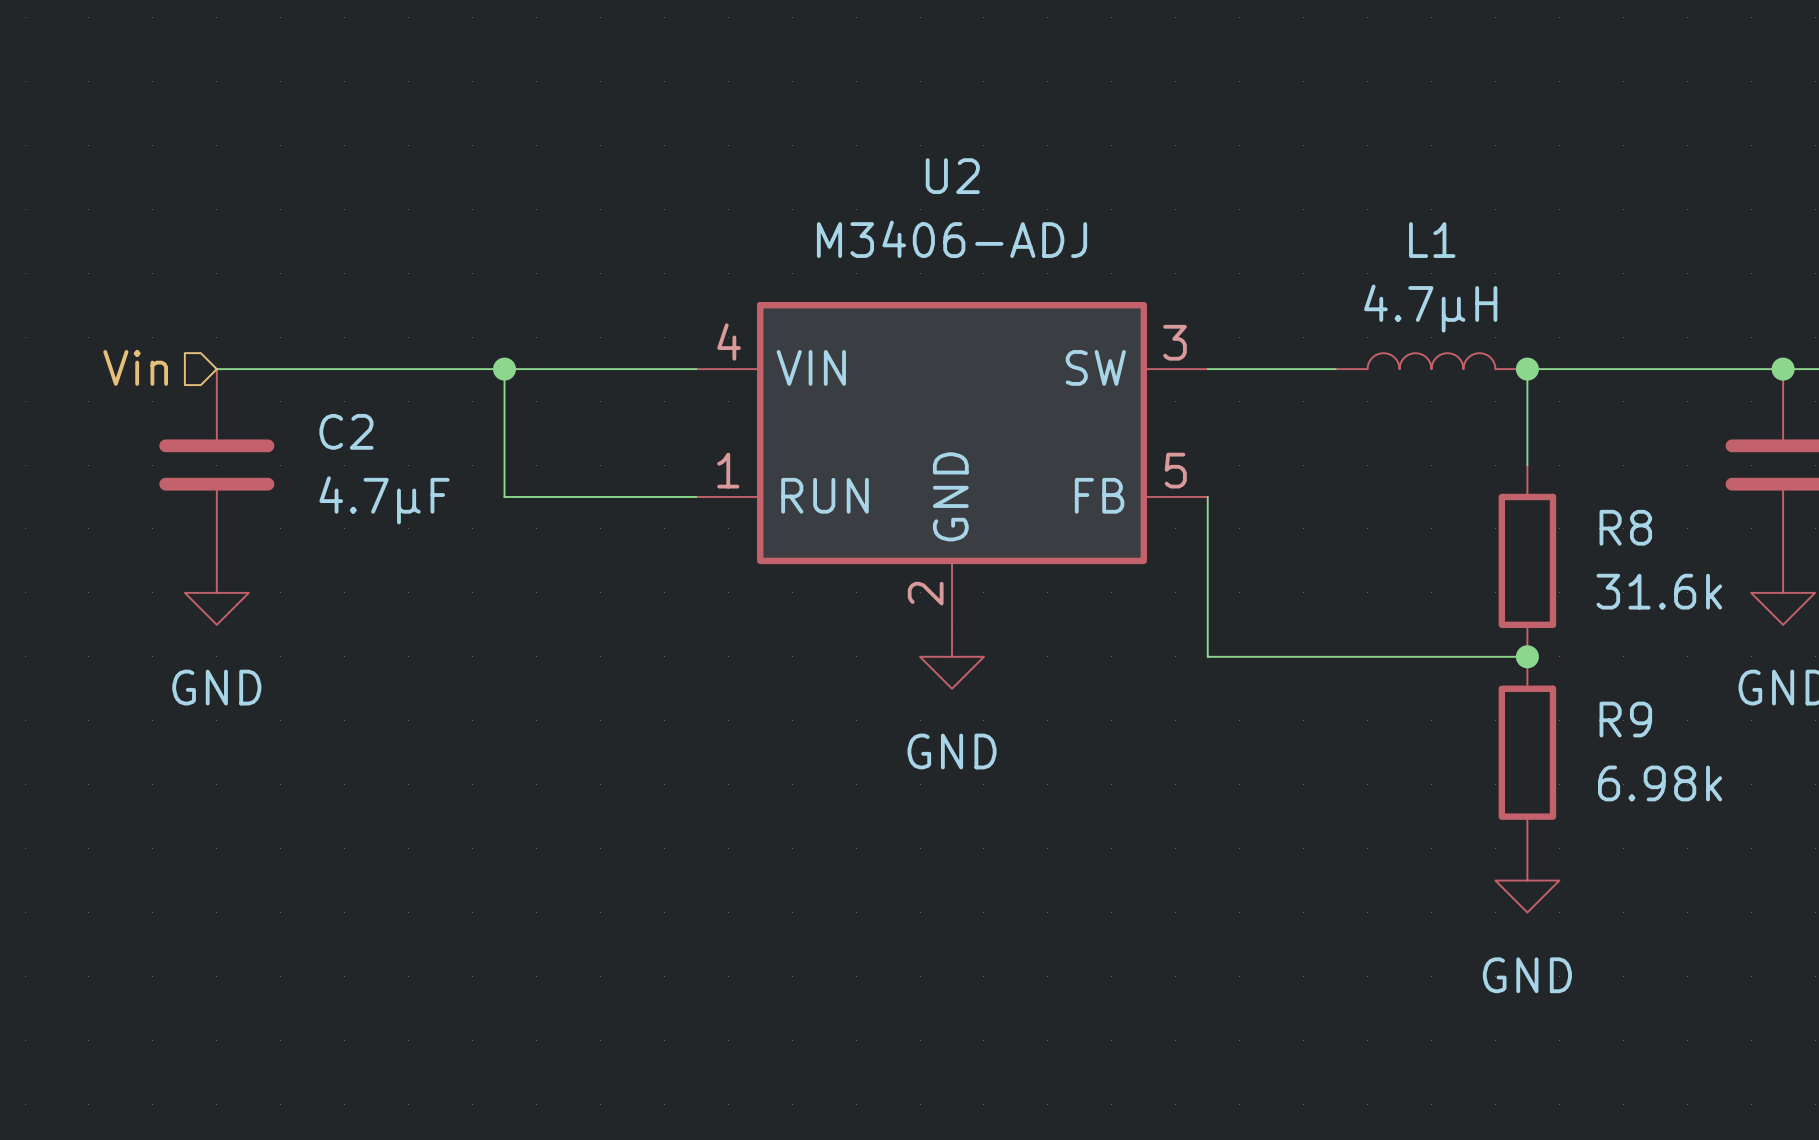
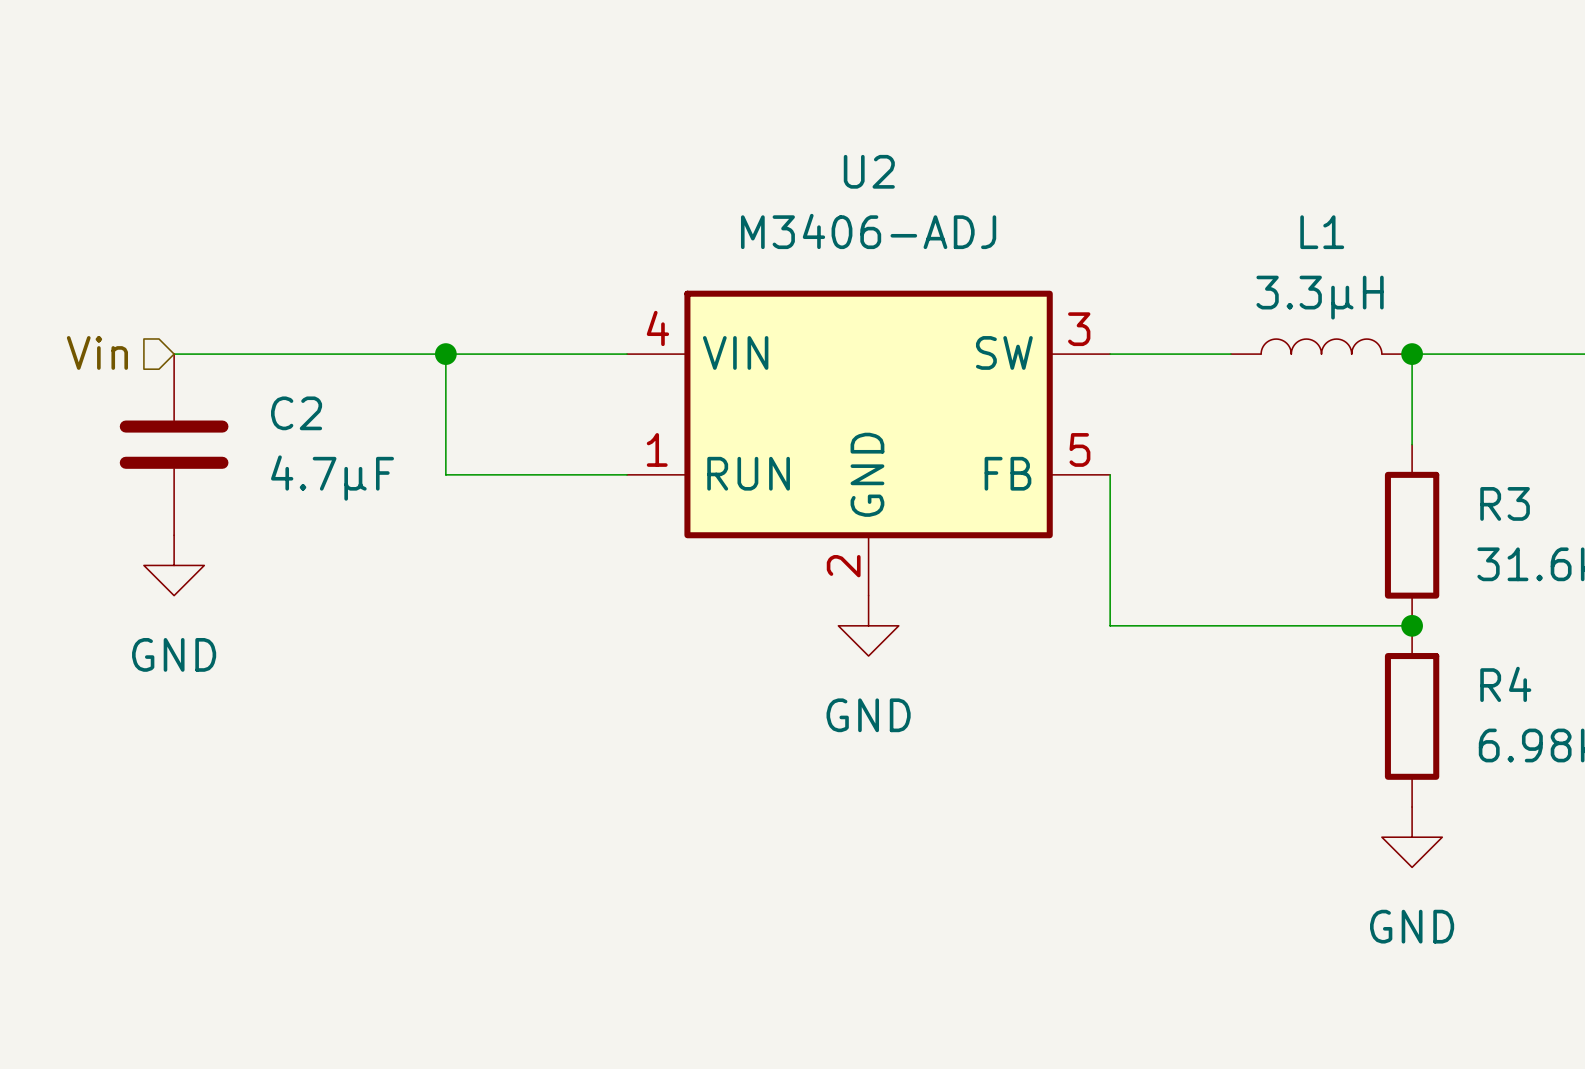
L1 value: 4.7µH (1430, 308) -> 3.3µH (1320, 297)
R8 name: R8 (1625, 527) -> R3 (1505, 503)
R9 name: R9 (1625, 719) -> R4 (1505, 684)

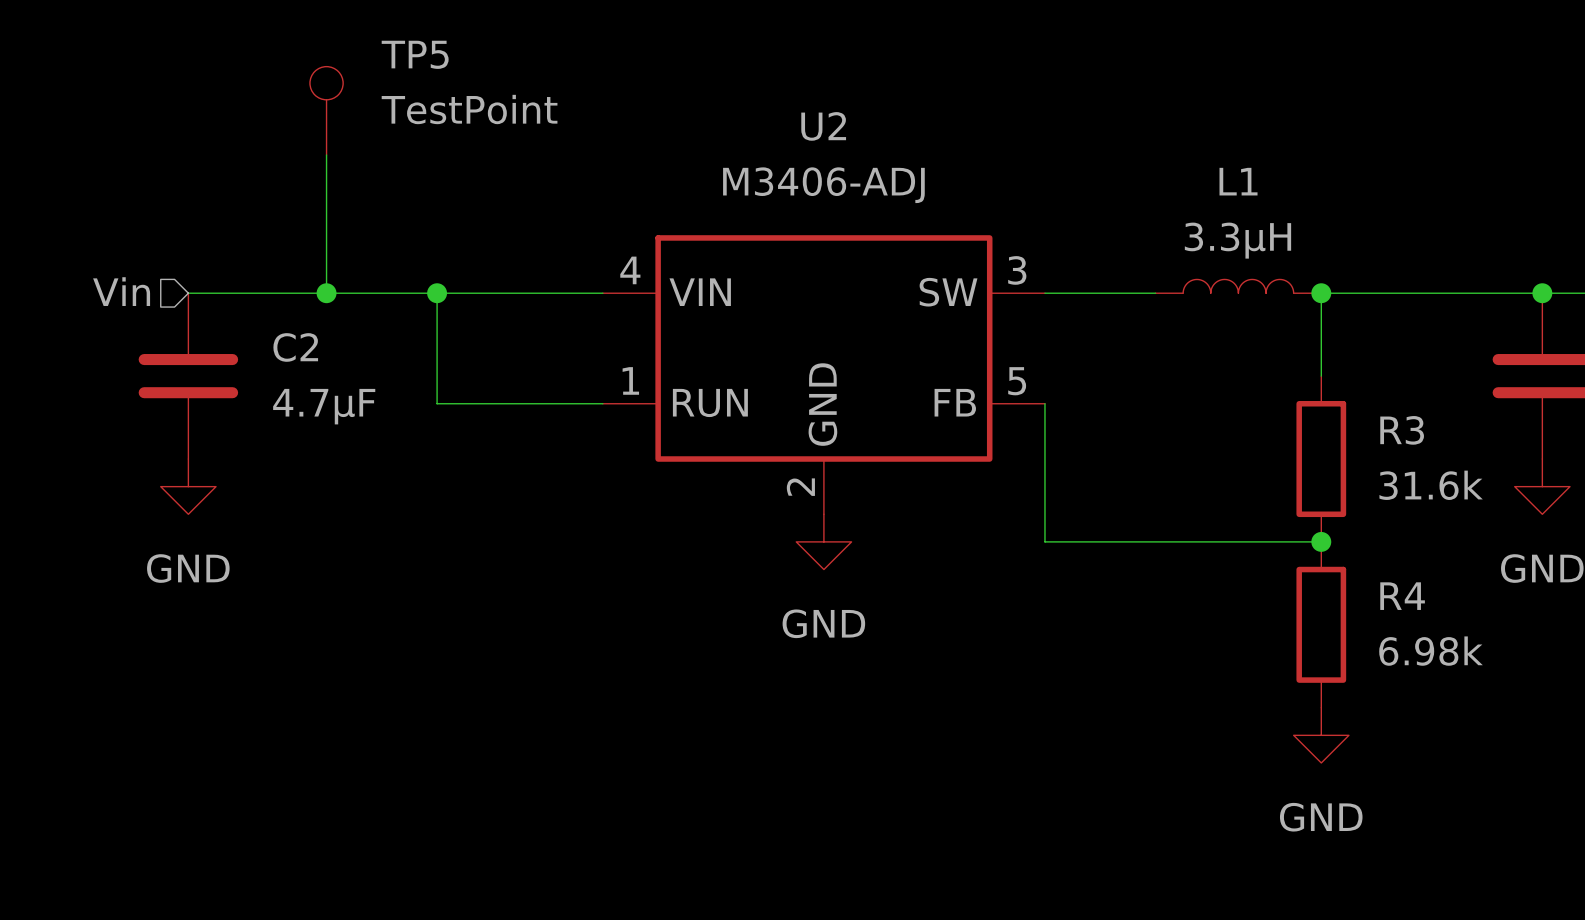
TP5: none -> TestPoint (326, 110)
wire: none -> (326, 155) (326, 293)
junction: none -> (326, 293)

